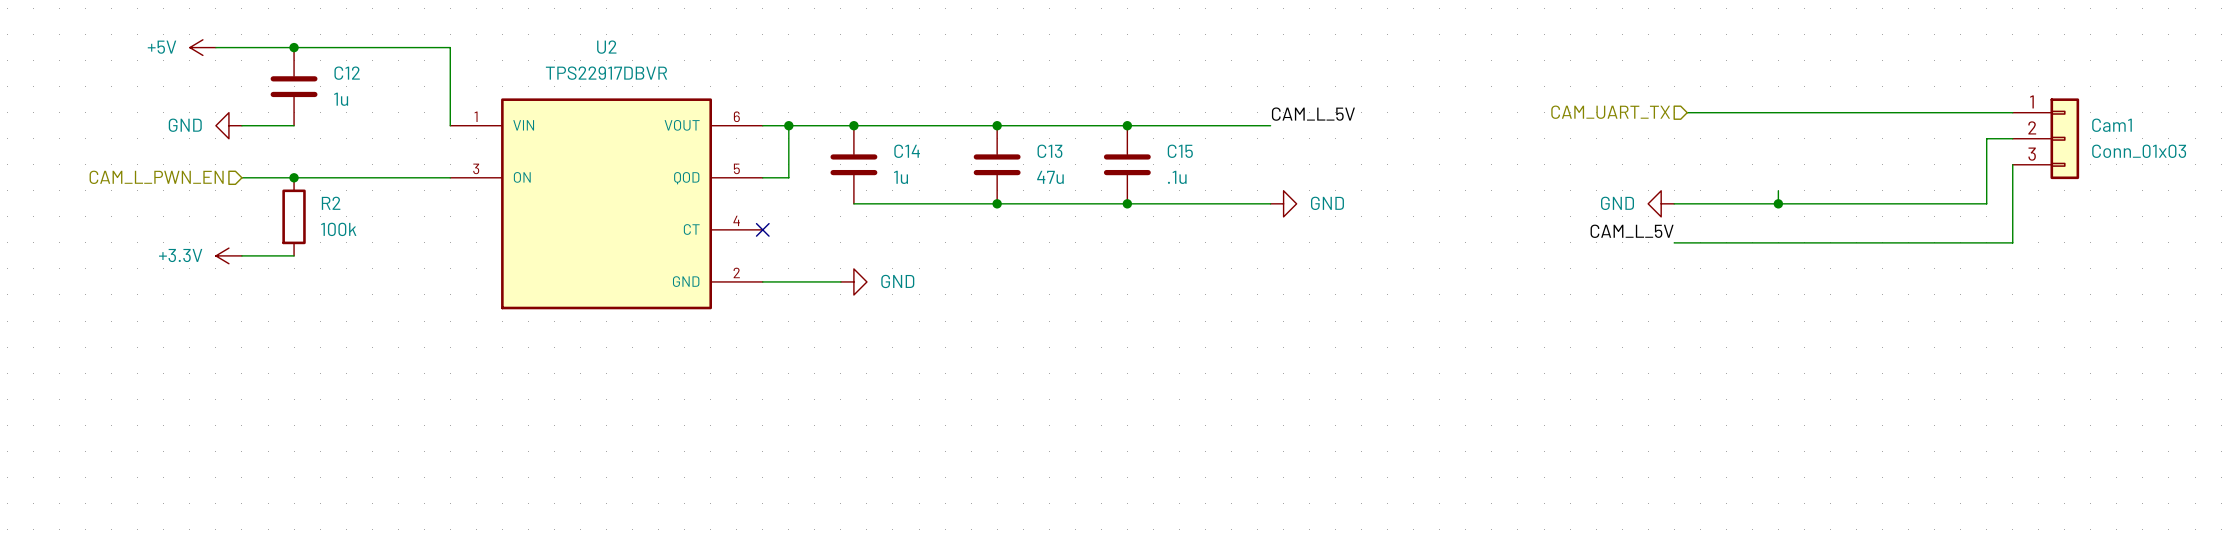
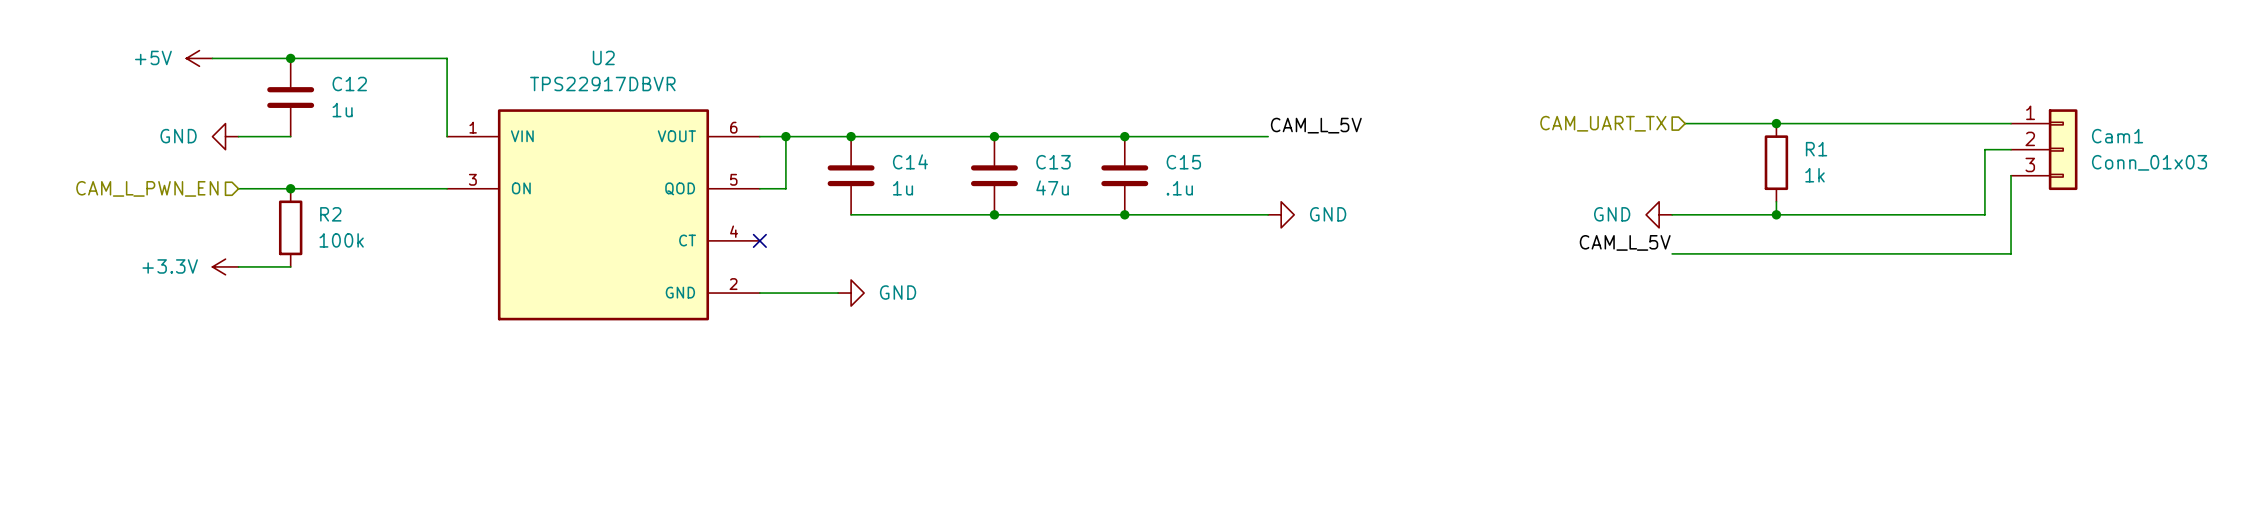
junction: none -> (1776, 123)
R1: none -> 1k (1776, 162)

